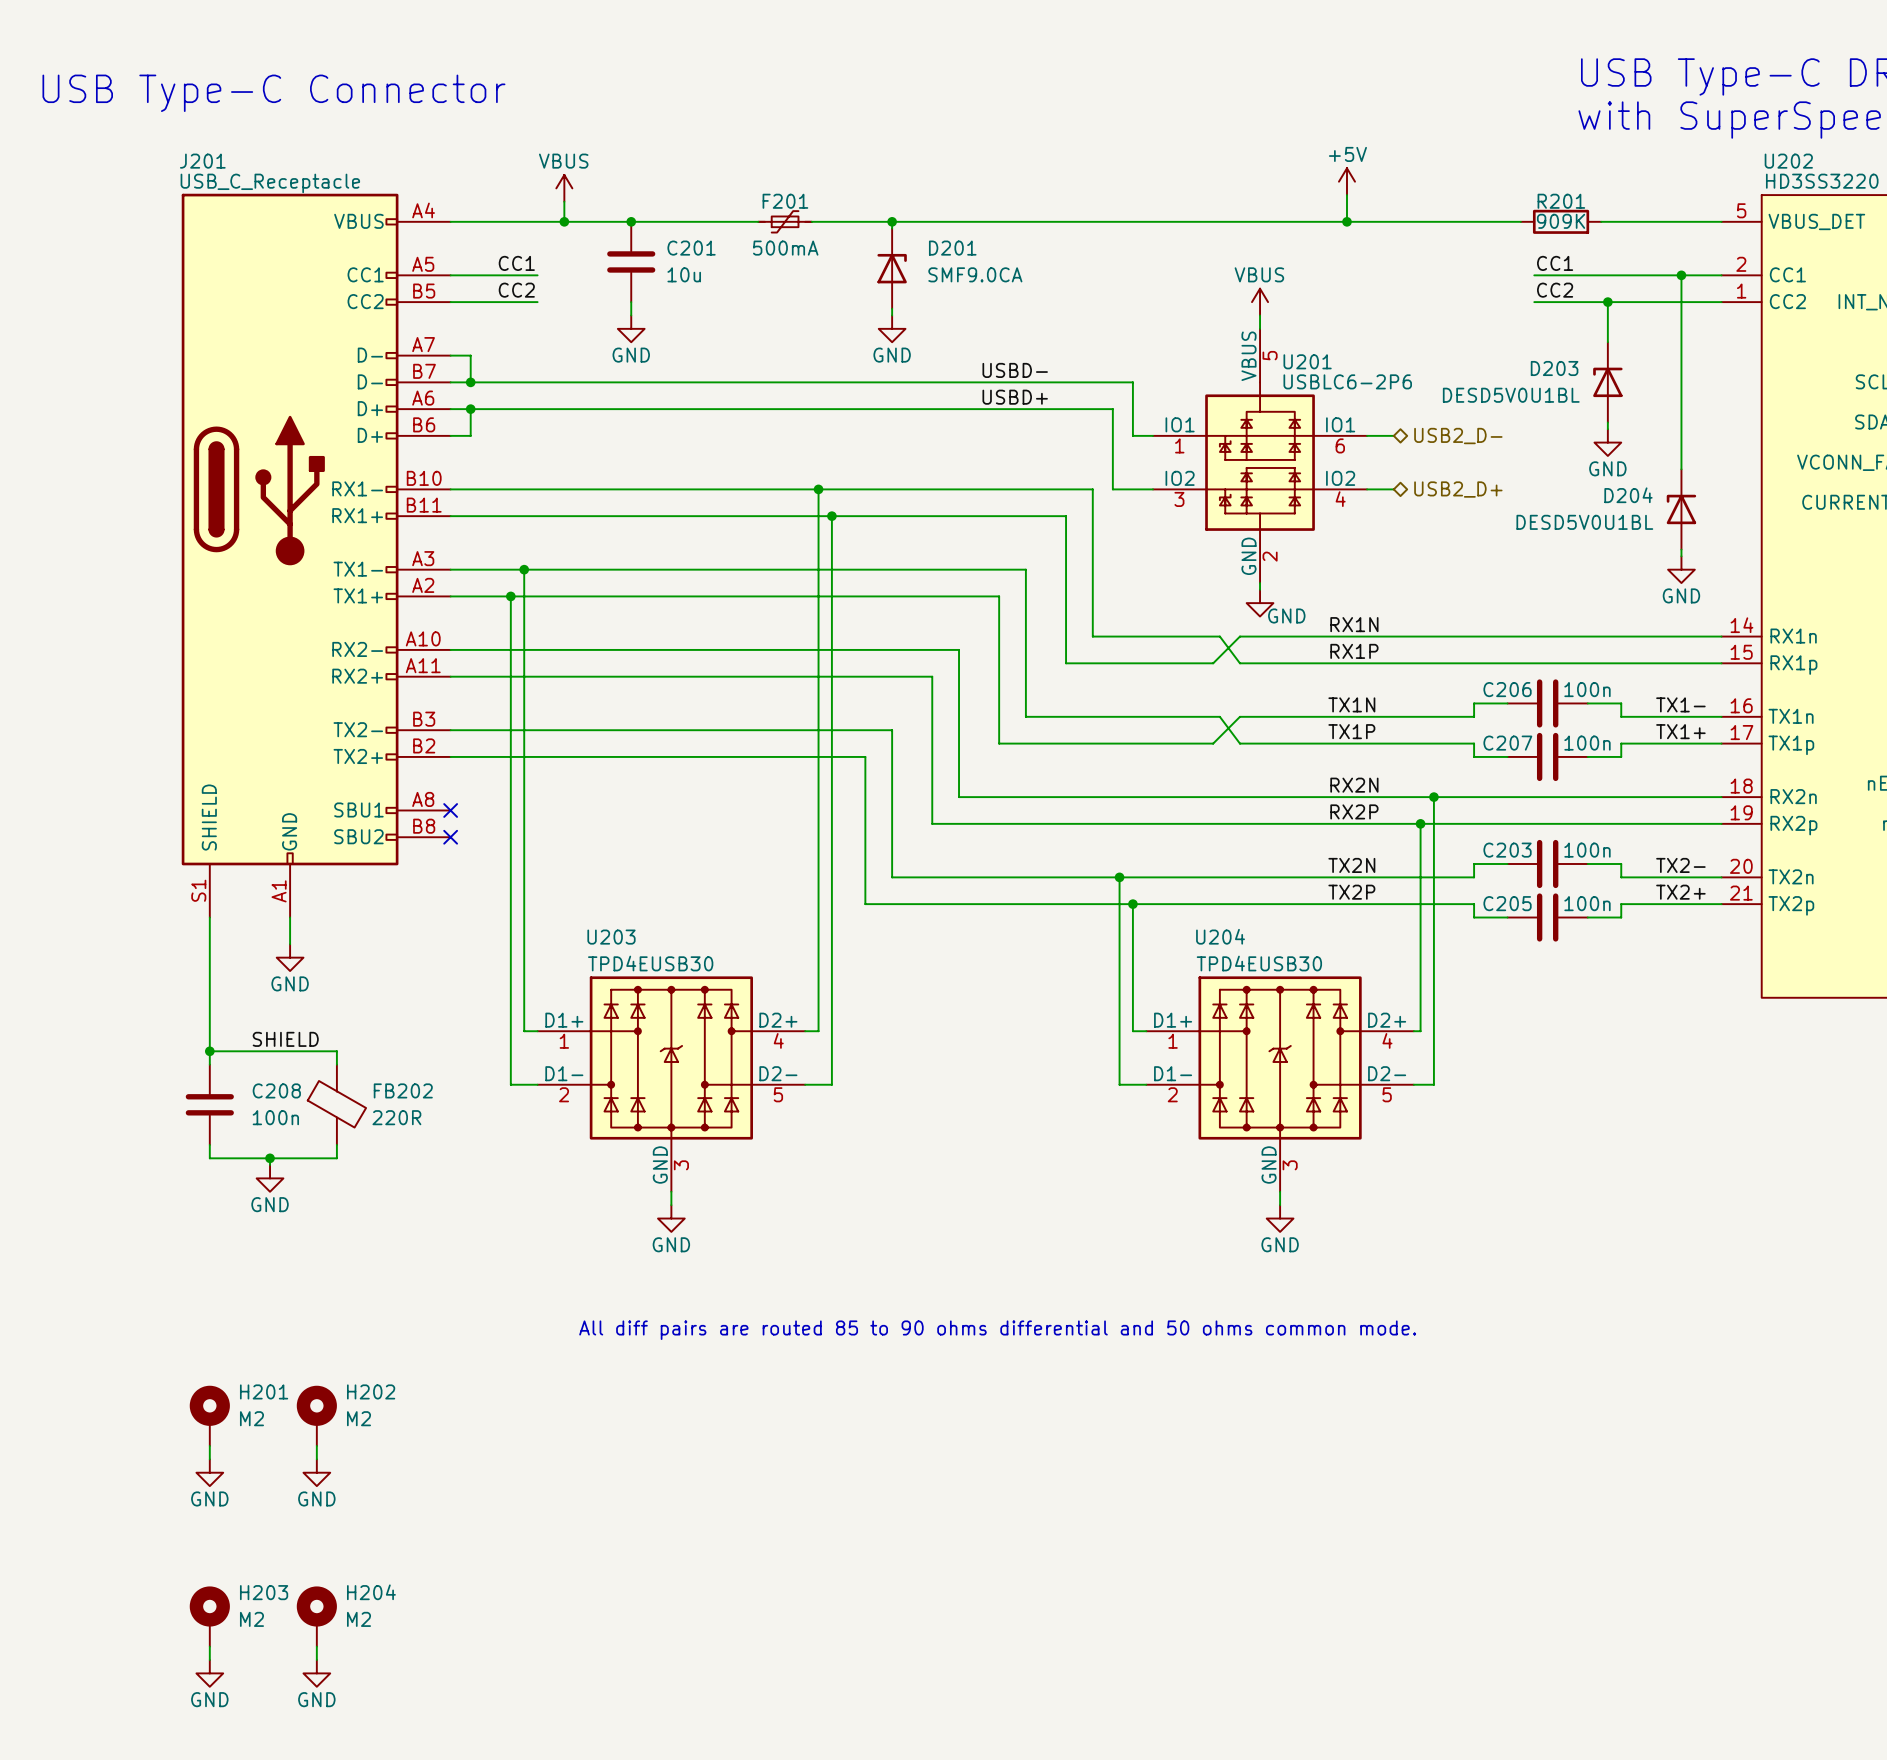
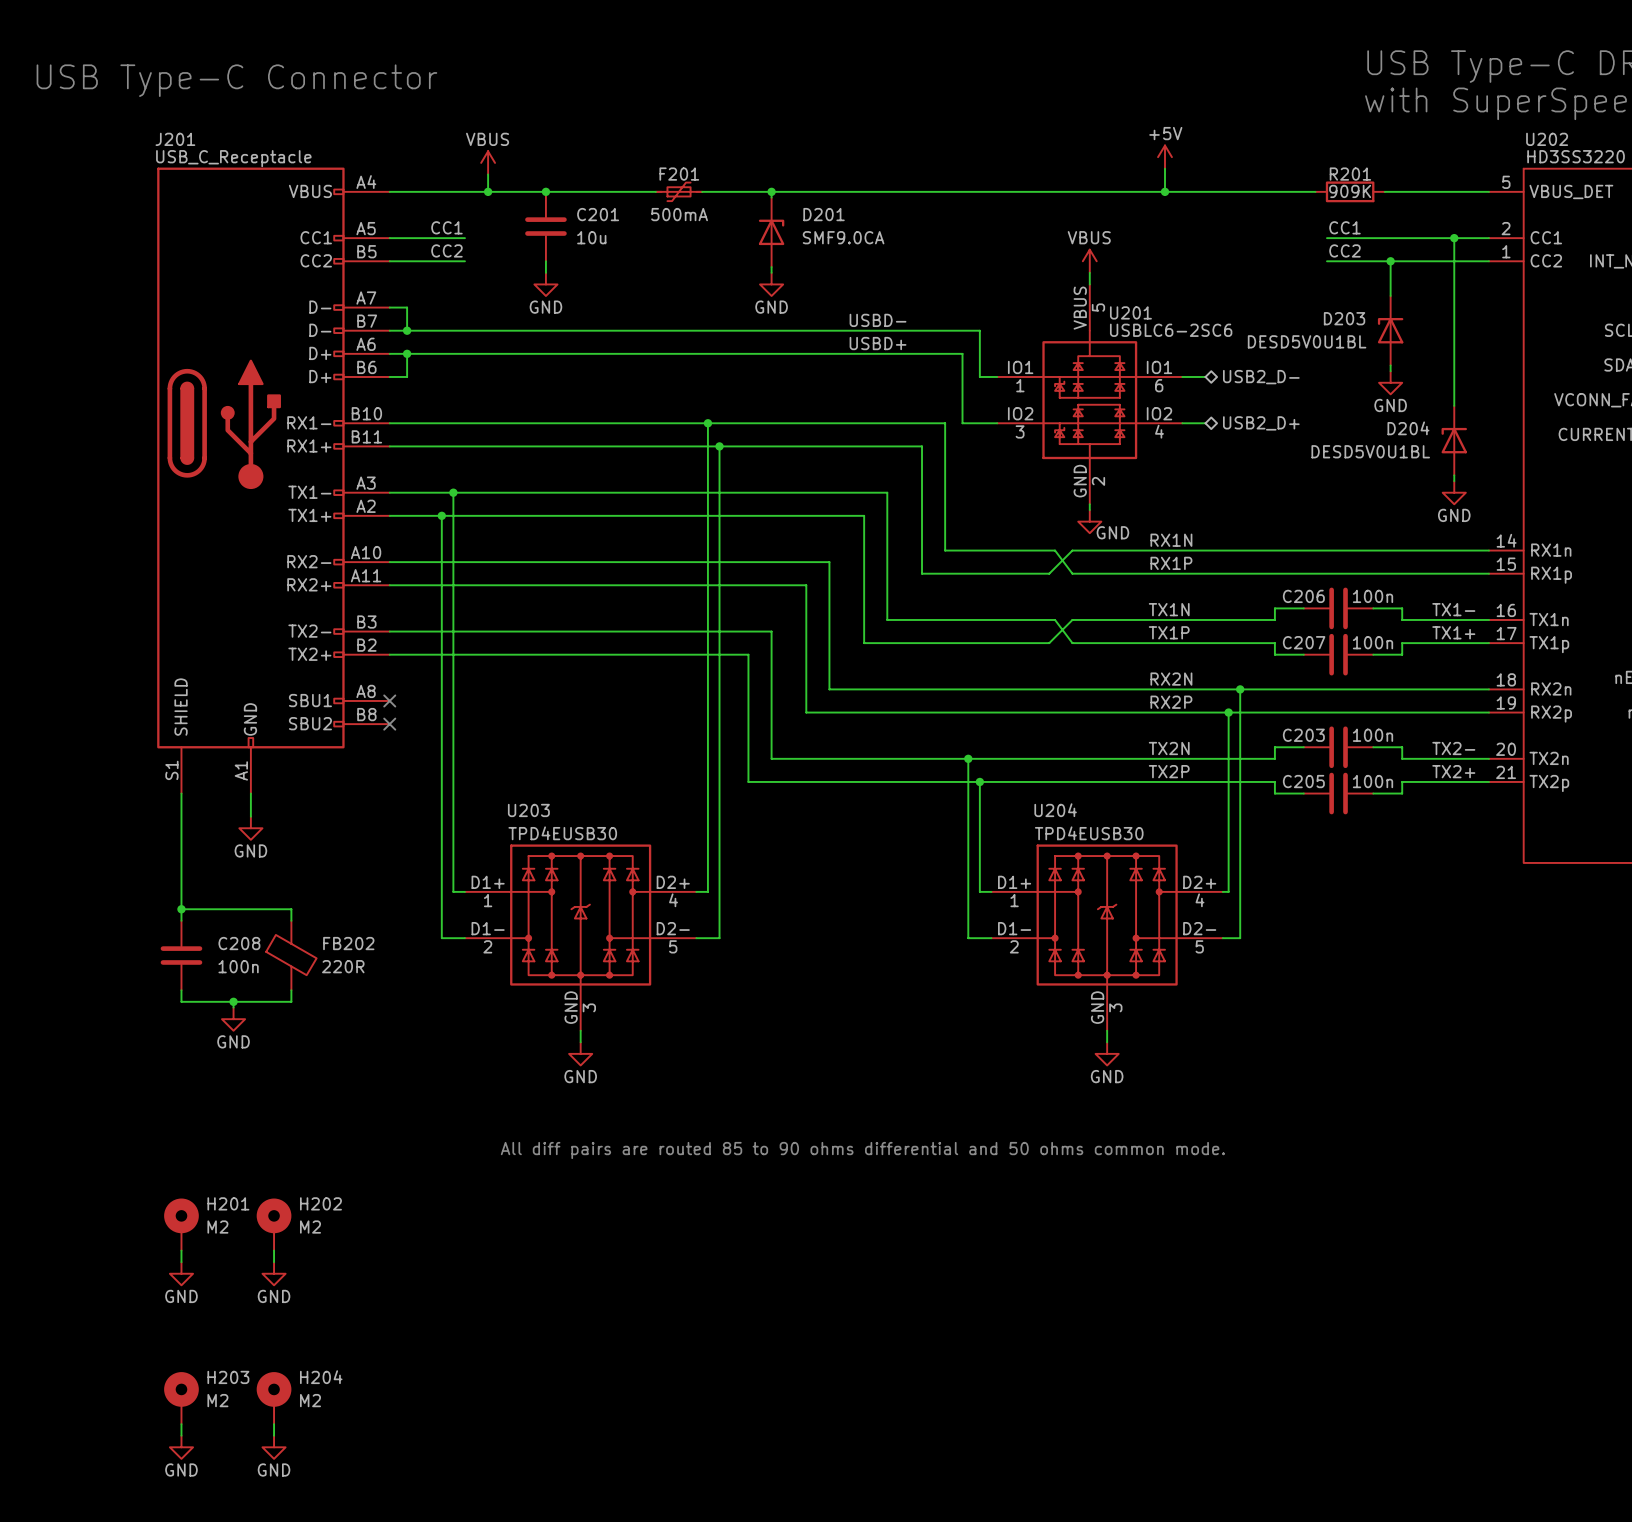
U201 value: USBLC6-2P6 (1347, 381) -> USBLC6-2SC6 (1171, 330)
label: SHIELD (285, 1039) -> none

